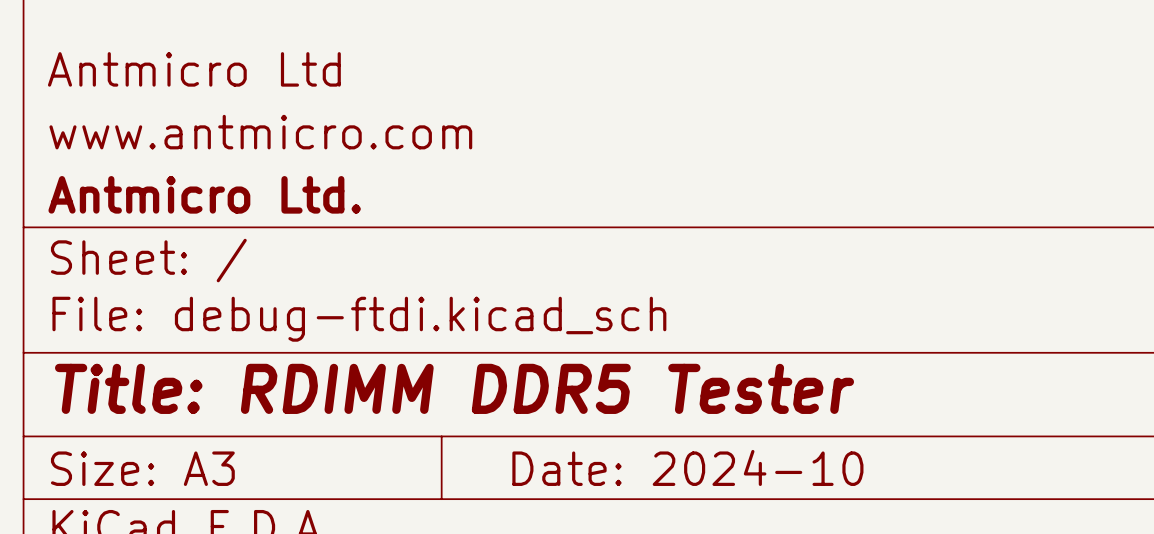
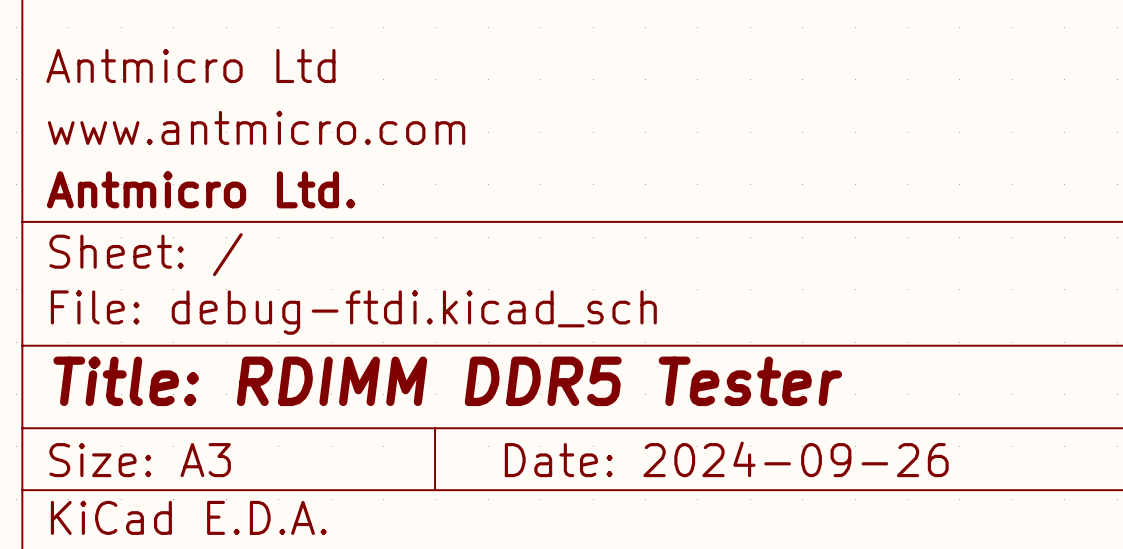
title block: Date: 2024-10 (687, 467) -> Date: 2024-09-26 (726, 459)

